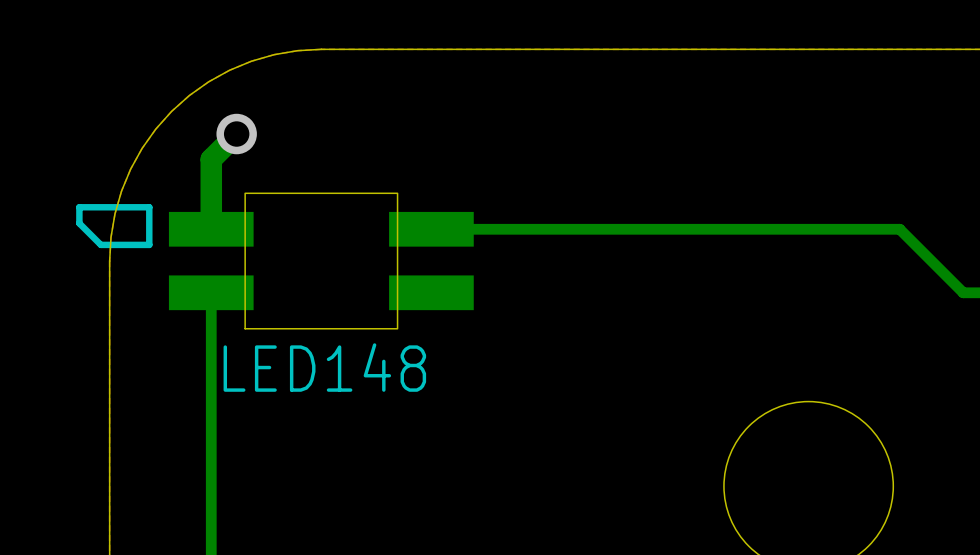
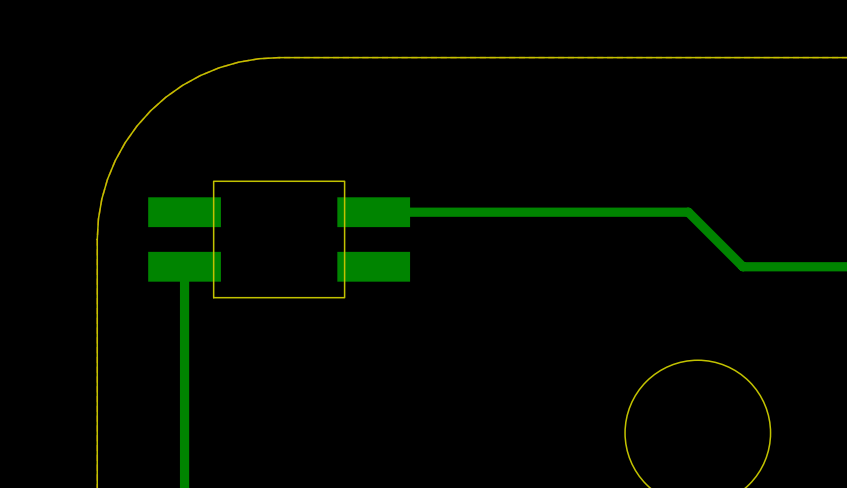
bottom track: (236, 134) (211, 159) (211, 229) -> none
via: (236, 134) -> none
bottom track: (797, 229) (899, 229) (963, 292) -> (688, 212) (742, 266) (830, 266)
LED148: (274, 261) -> none
part: none -> (279, 239)

